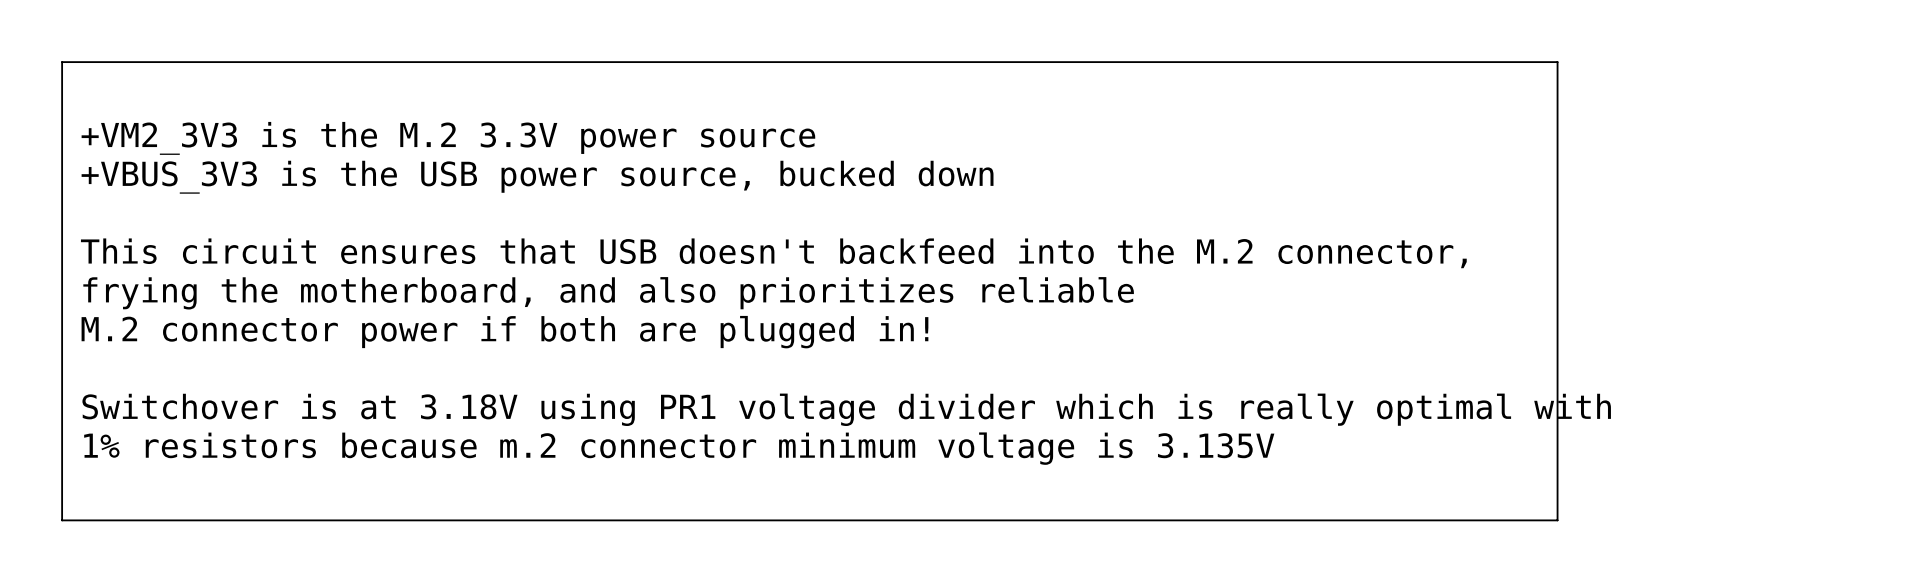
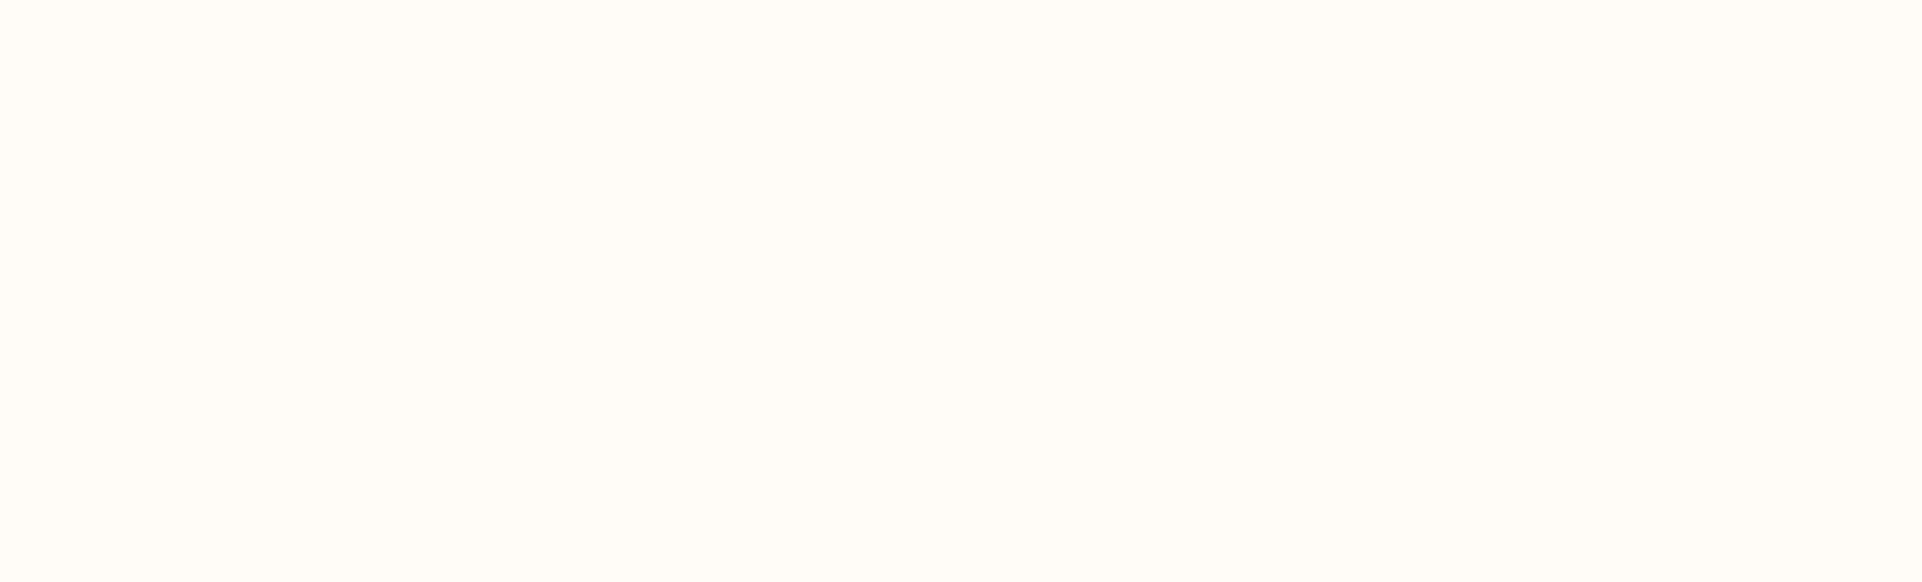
line: (62, 62) (1557, 62) (1557, 520) (62, 520) (62, 62) -> none
text: +VM2_3V3 is the M.2 3.3V power source (448, 138) -> none
text: +VBUS_3V3 is the USB power source, bucked down (537, 177) -> none
text: This circuit ensures that USB doesn't backfeed into the M.2 connector, (773, 253) -> none
text: frying the motherboard, and also prioritizes reliable (608, 293) -> none
text: M.2 connector power if both are plugged in! (504, 332) -> none
text: Switchover is at 3.18V using PR1 voltage divider which is really optimal with (846, 409) -> none
text: 1% resistors because m.2 connector minimum voltage is 3.135V (679, 448) -> none

